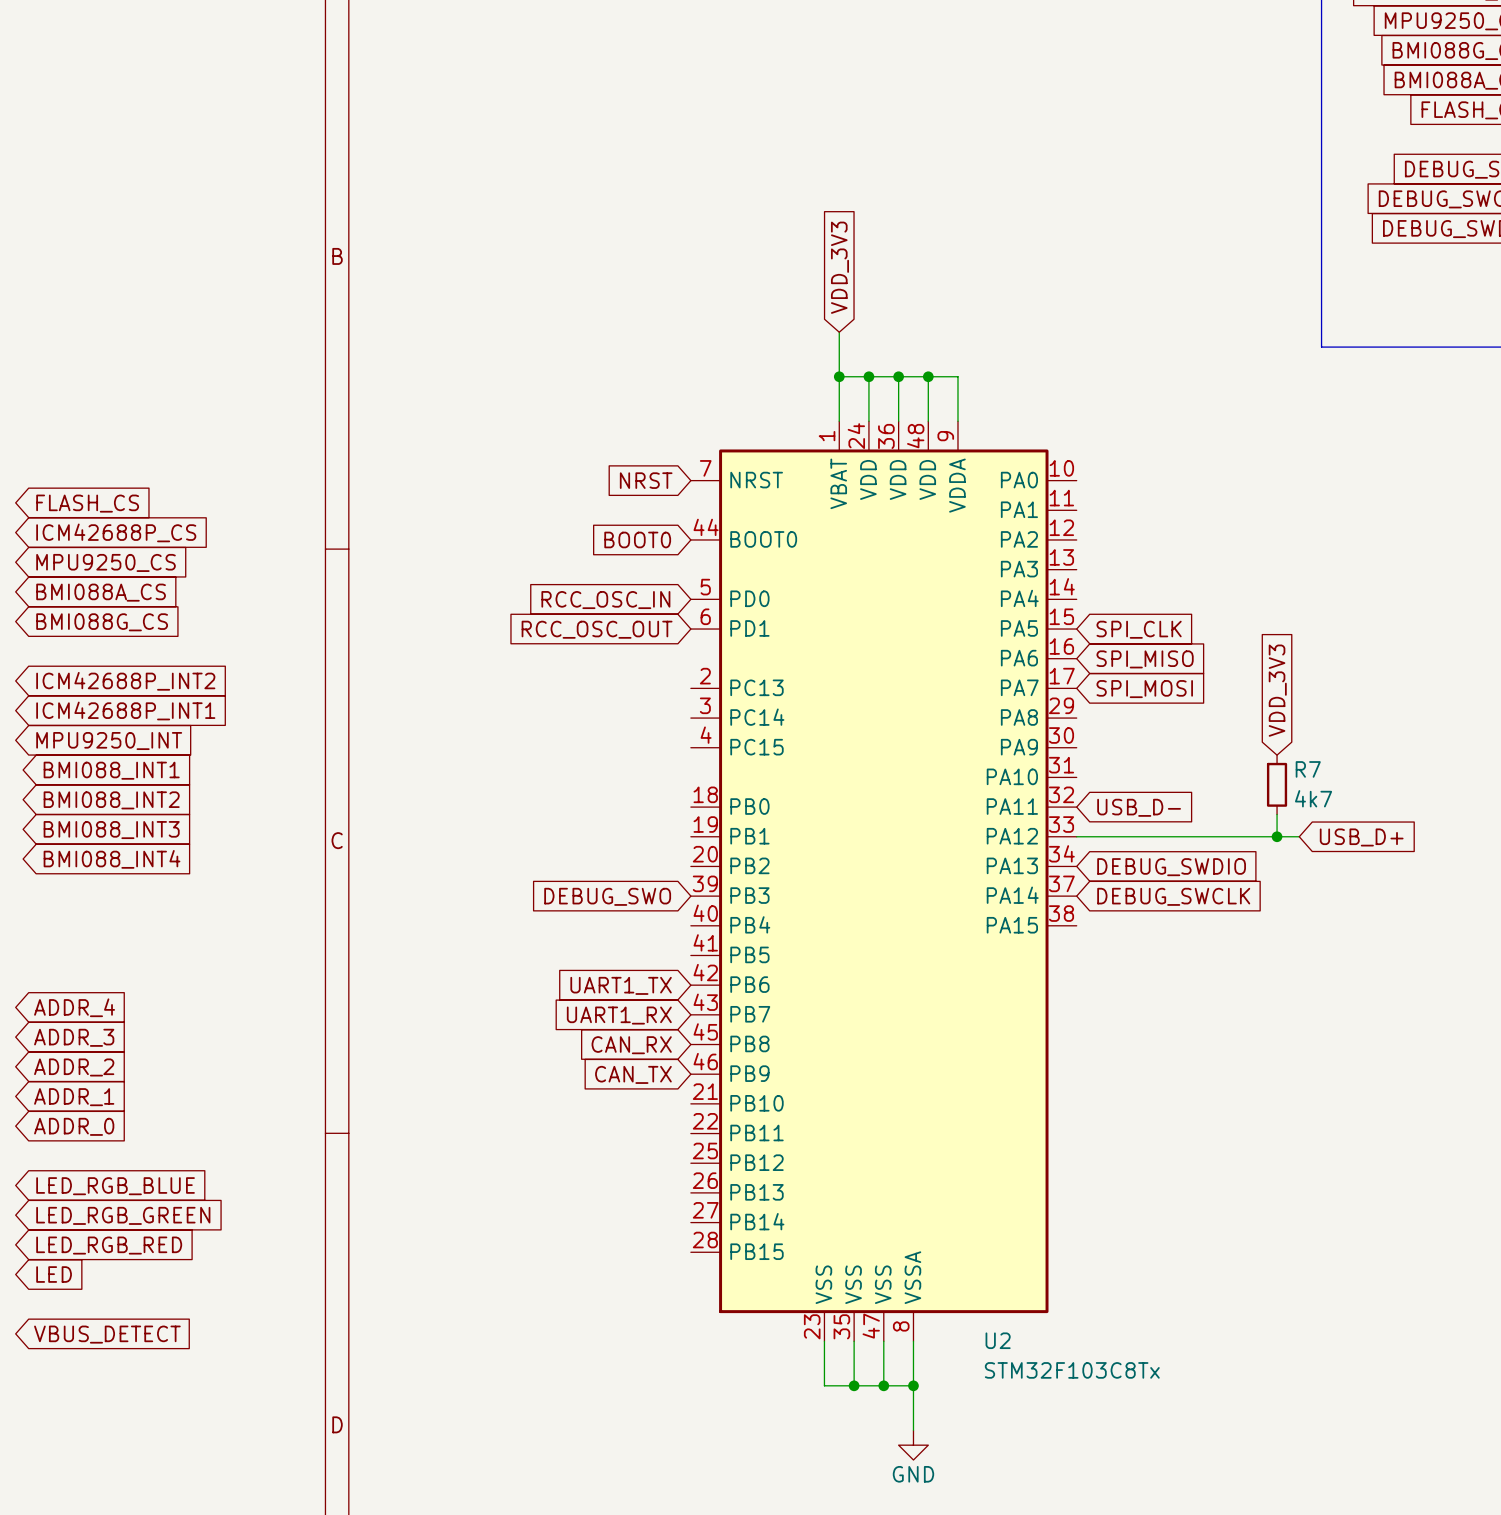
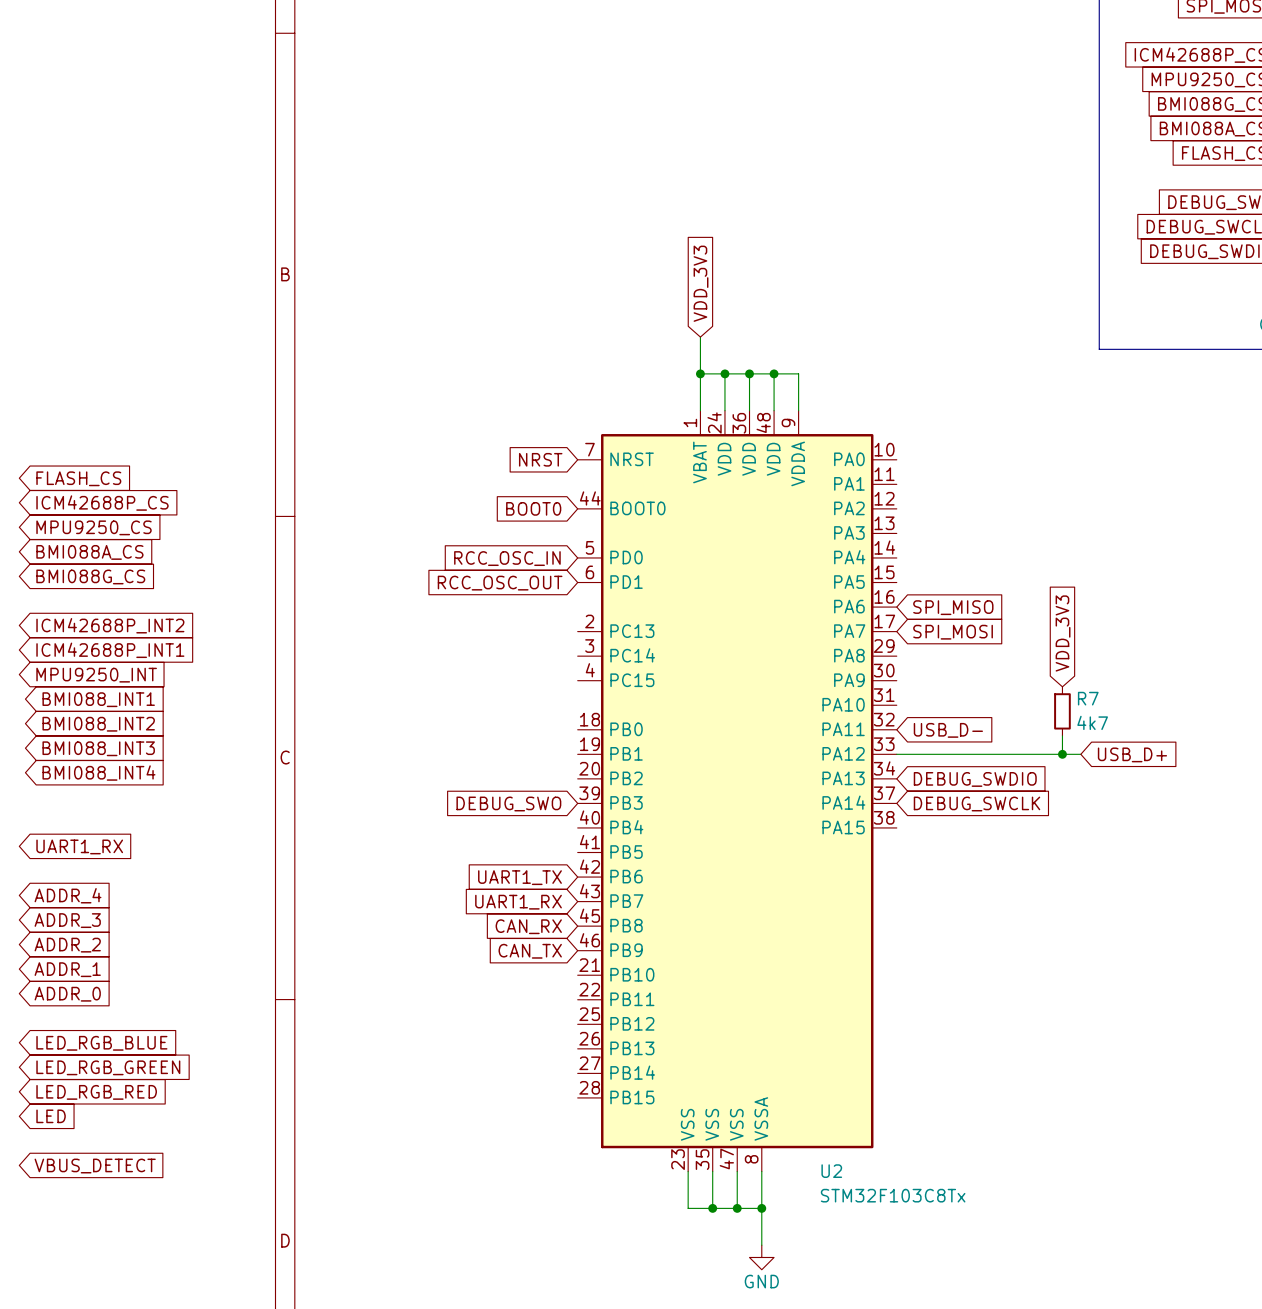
global label: SPI_CLK (1139, 629) -> none
global label: none -> UART1_RX (79, 846)

